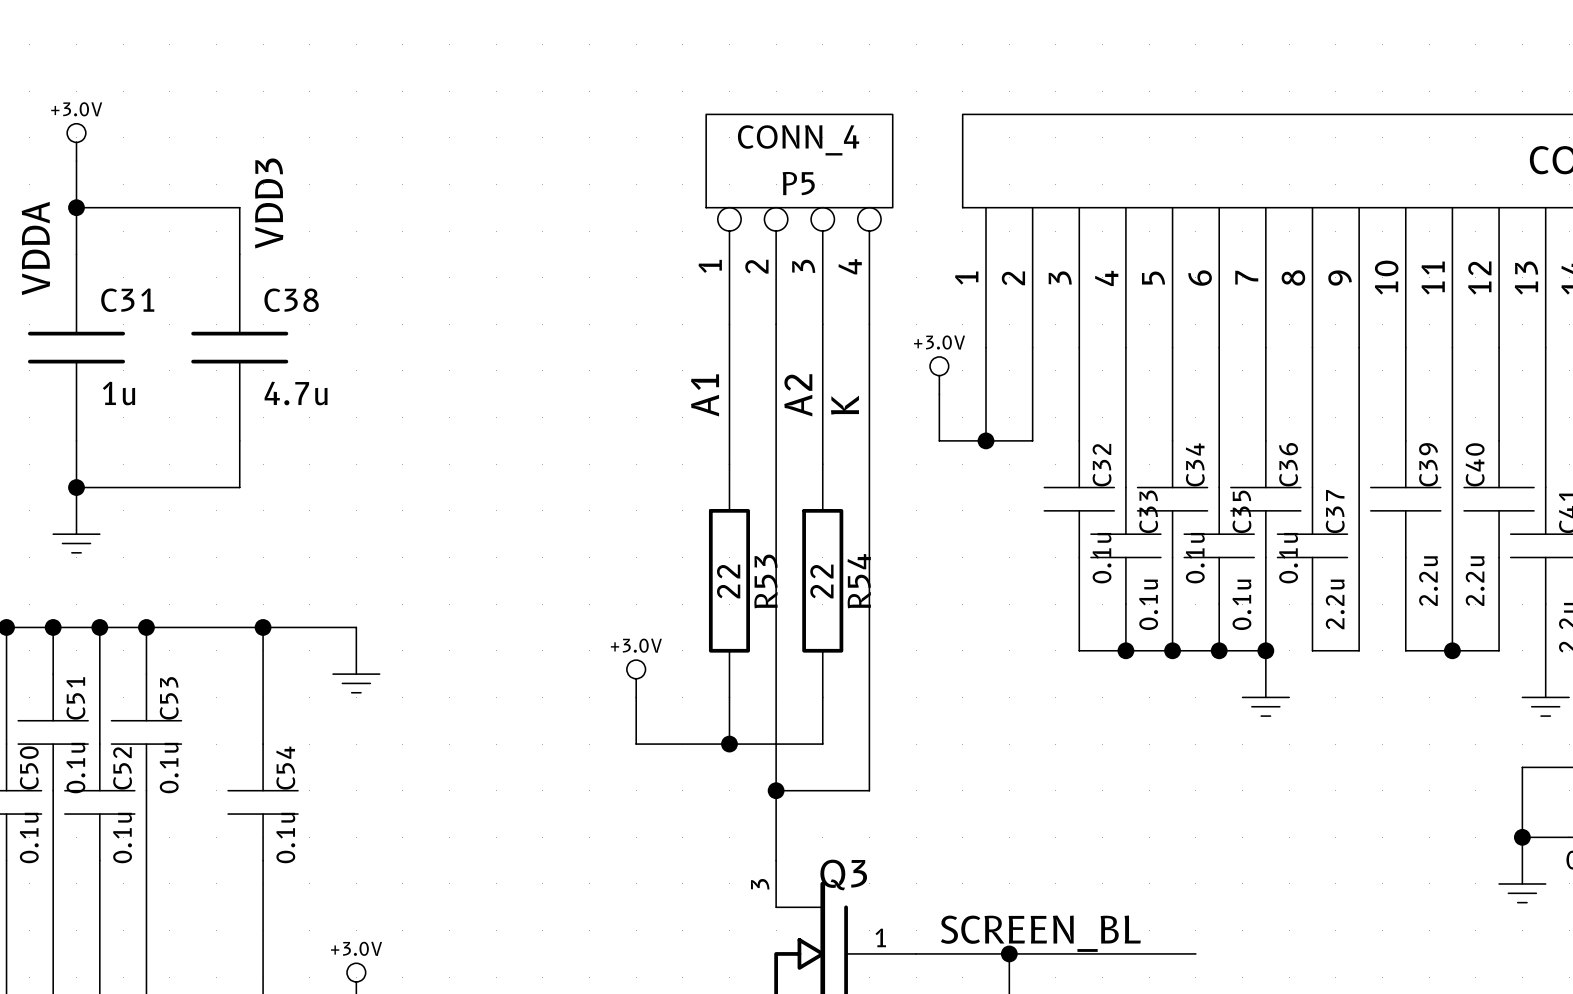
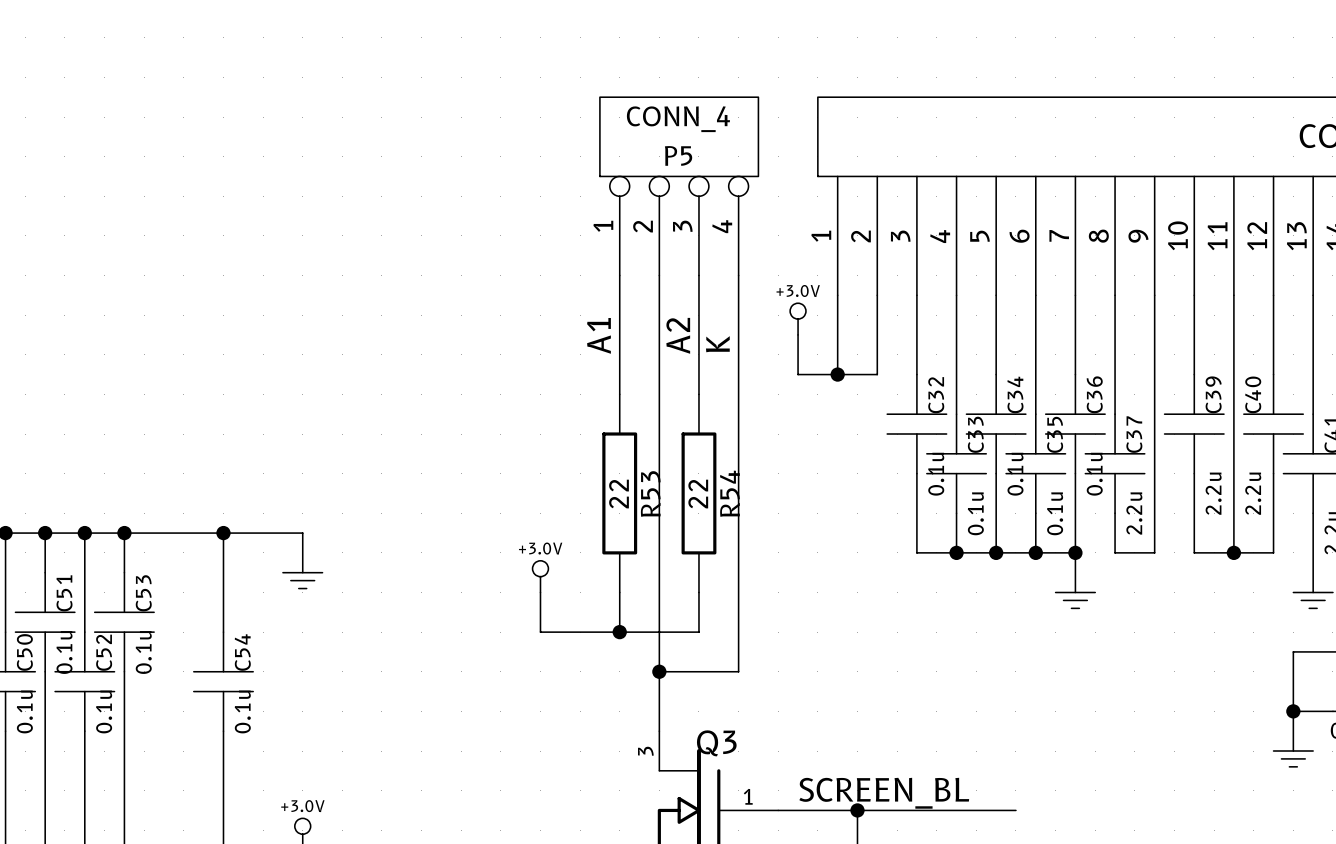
power symbol: +3.0V (76, 142) -> none
wire: (76, 161) (76, 254) -> none
text: VDD3 (269, 203) -> none
wire: (76, 207) (239, 207) (239, 254) -> none
junction: (76, 207) -> none
text: VDDA (35, 248) -> none
C31: 1u (76, 347) -> none
C38: 4.7u (239, 347) -> none
wire: (76, 440) (76, 534) -> none
wire: (239, 440) (239, 487) (76, 487) -> none
junction: (76, 487) -> none
power symbol: (76, 543) -> none

